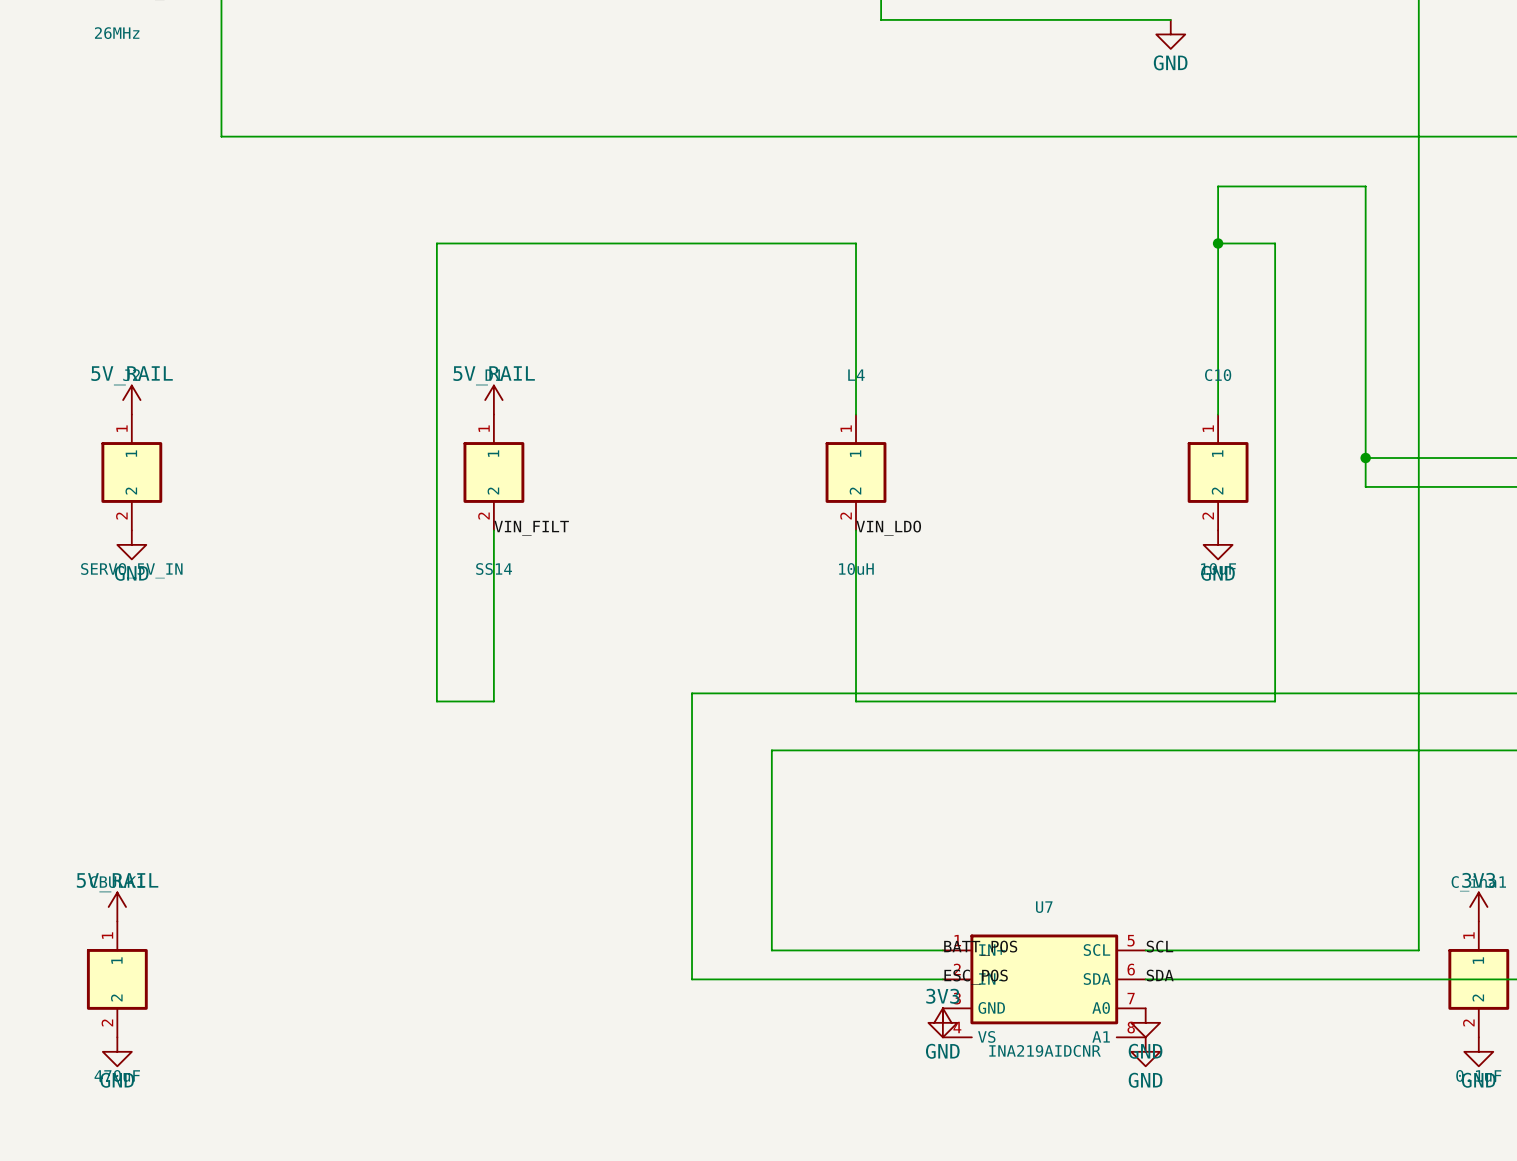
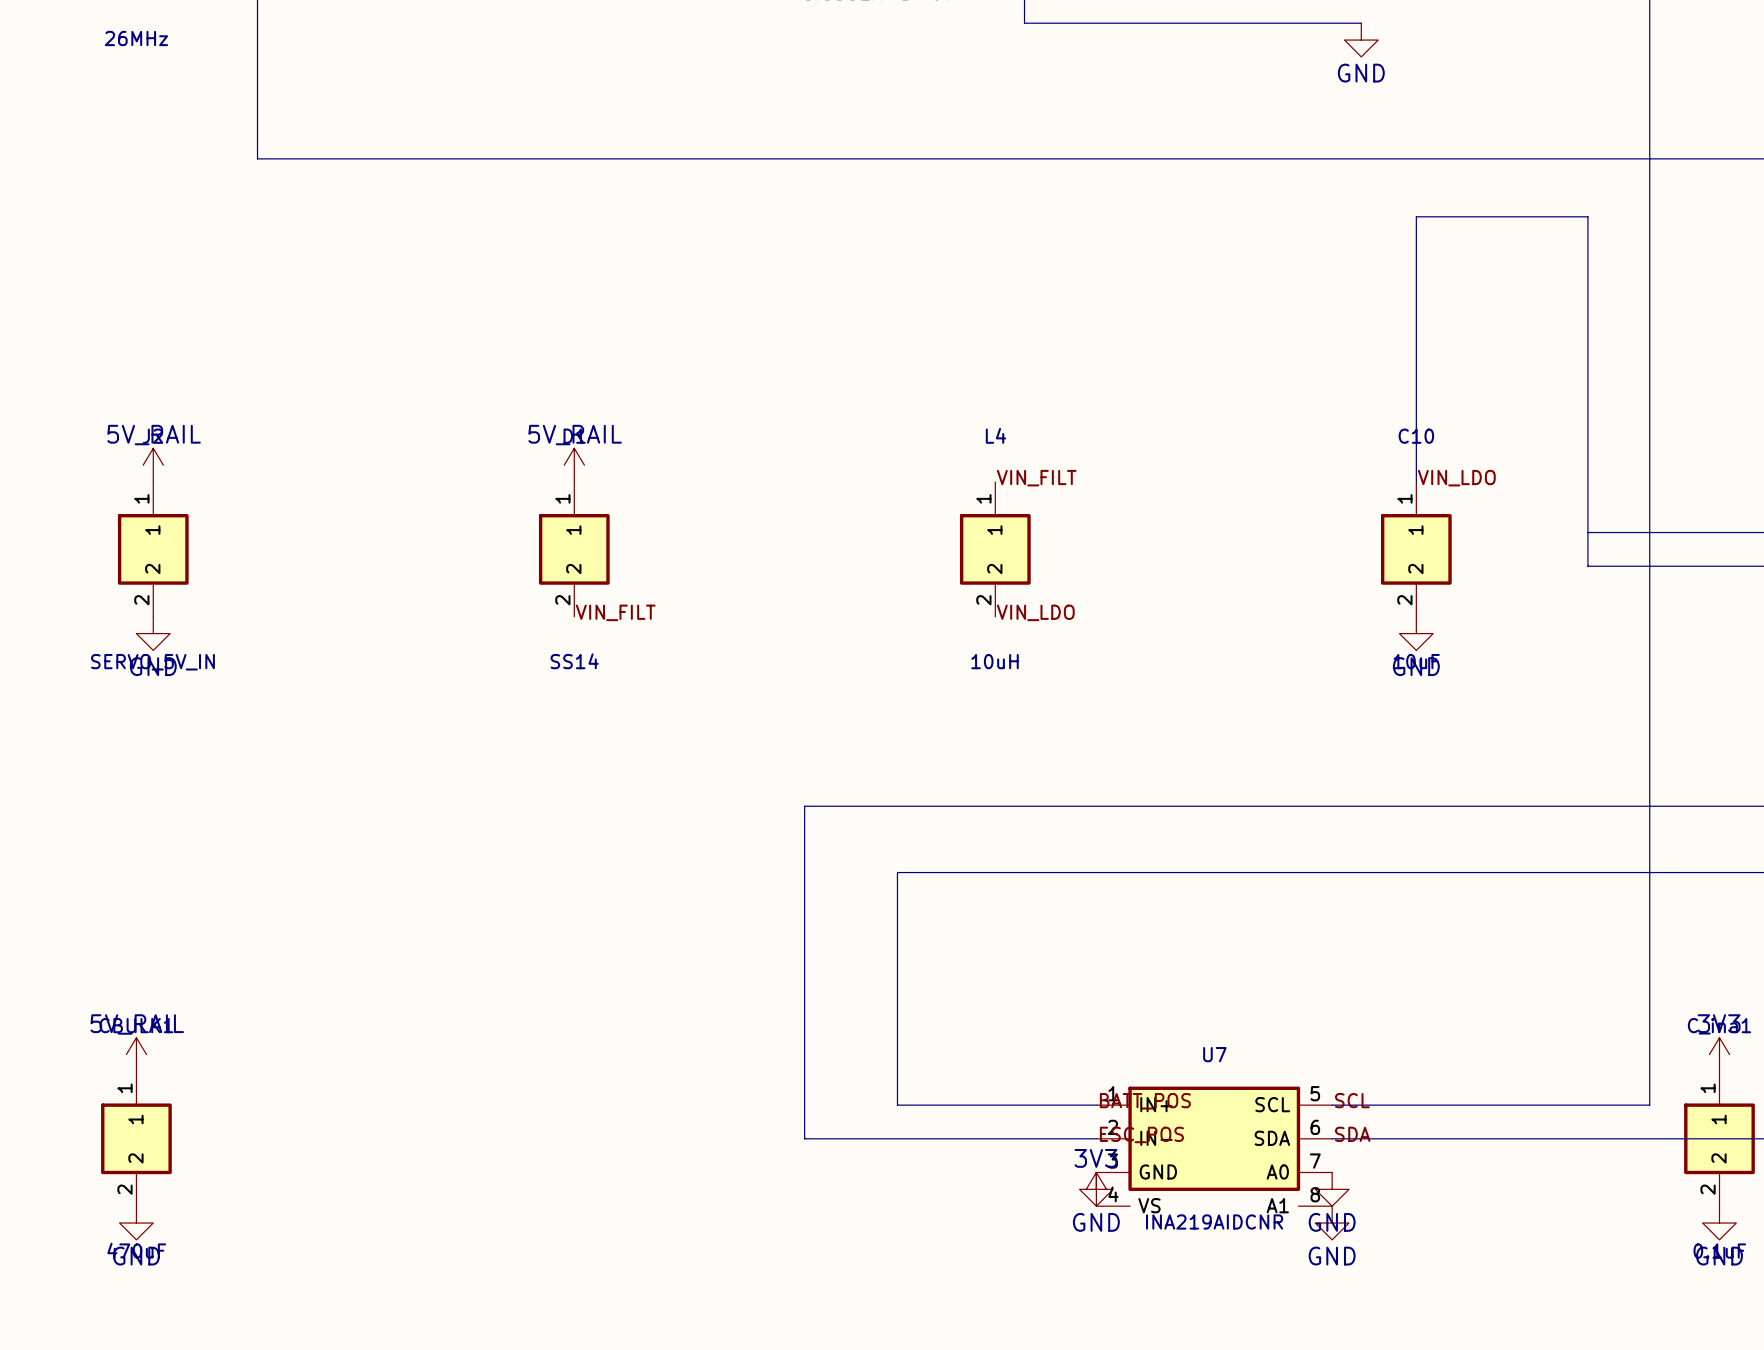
wire: (1218, 243) (1275, 243) (1275, 701) (856, 701) (856, 530) -> none
junction: (1218, 243) -> none
label: none -> VIN_FILT (1036, 478)
label: none -> VIN_LDO (1456, 478)
wire: (856, 414) (856, 243) (436, 243) (436, 701) (493, 701) (493, 530) -> none
junction: (1365, 458) -> none

